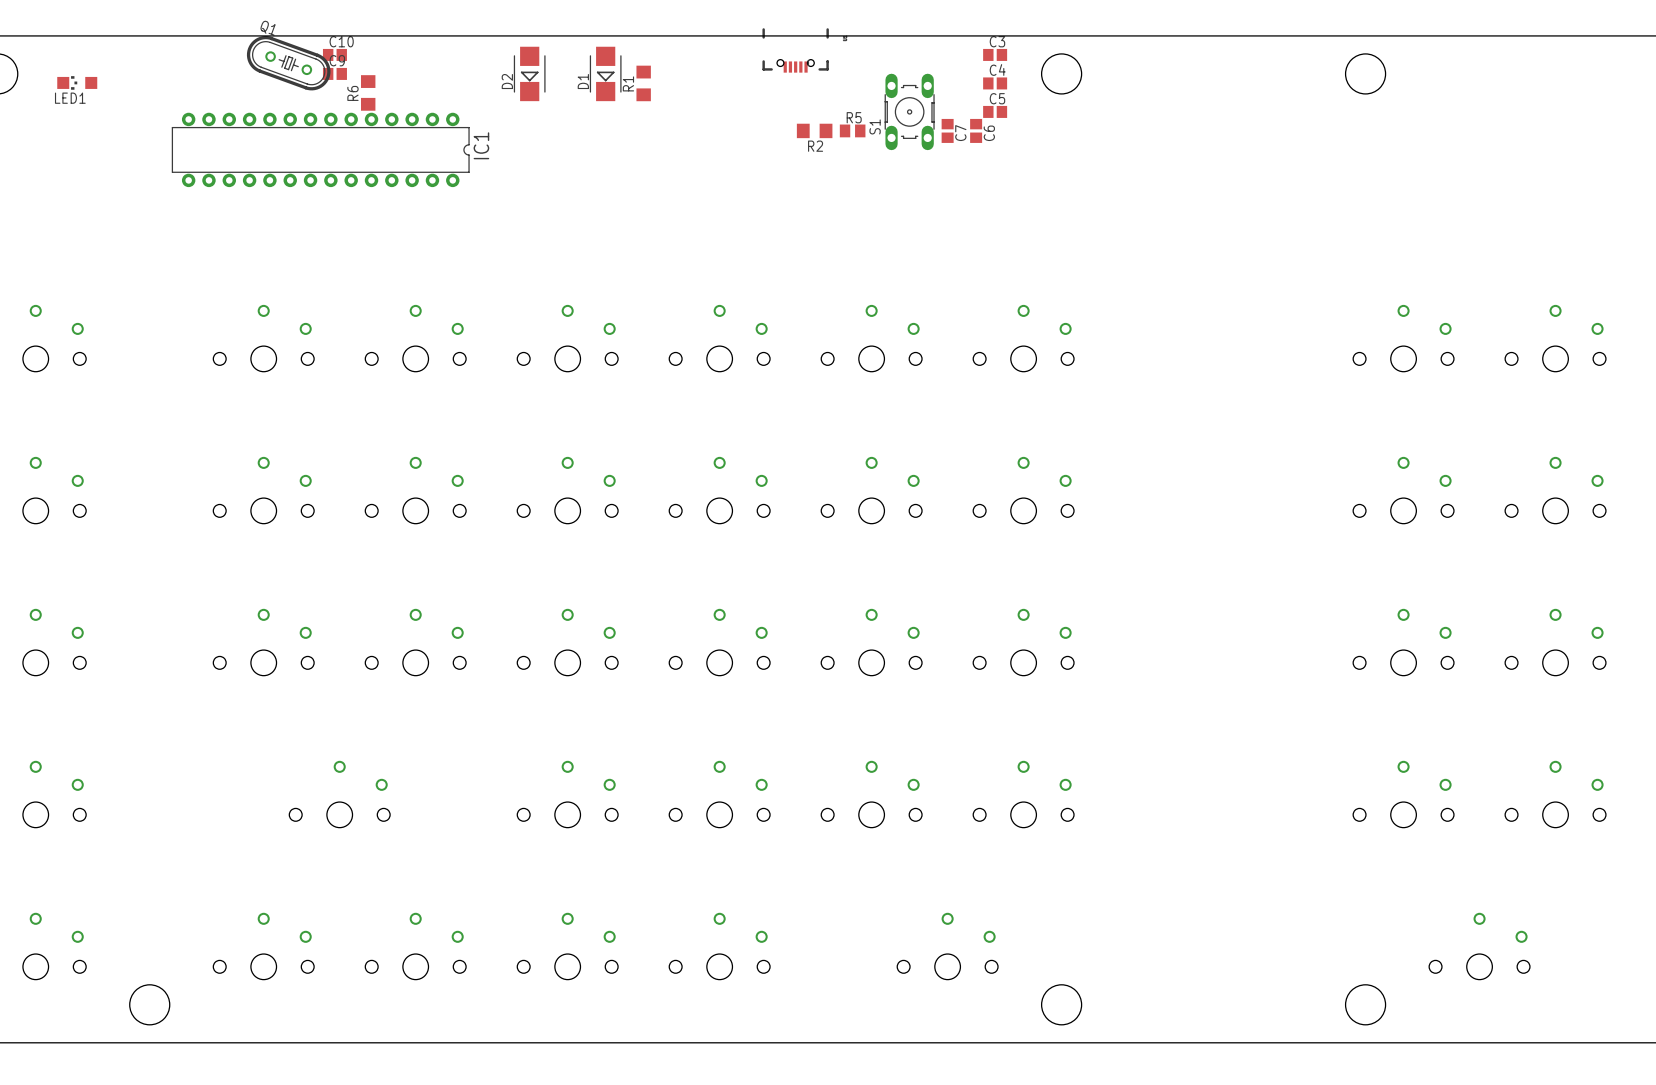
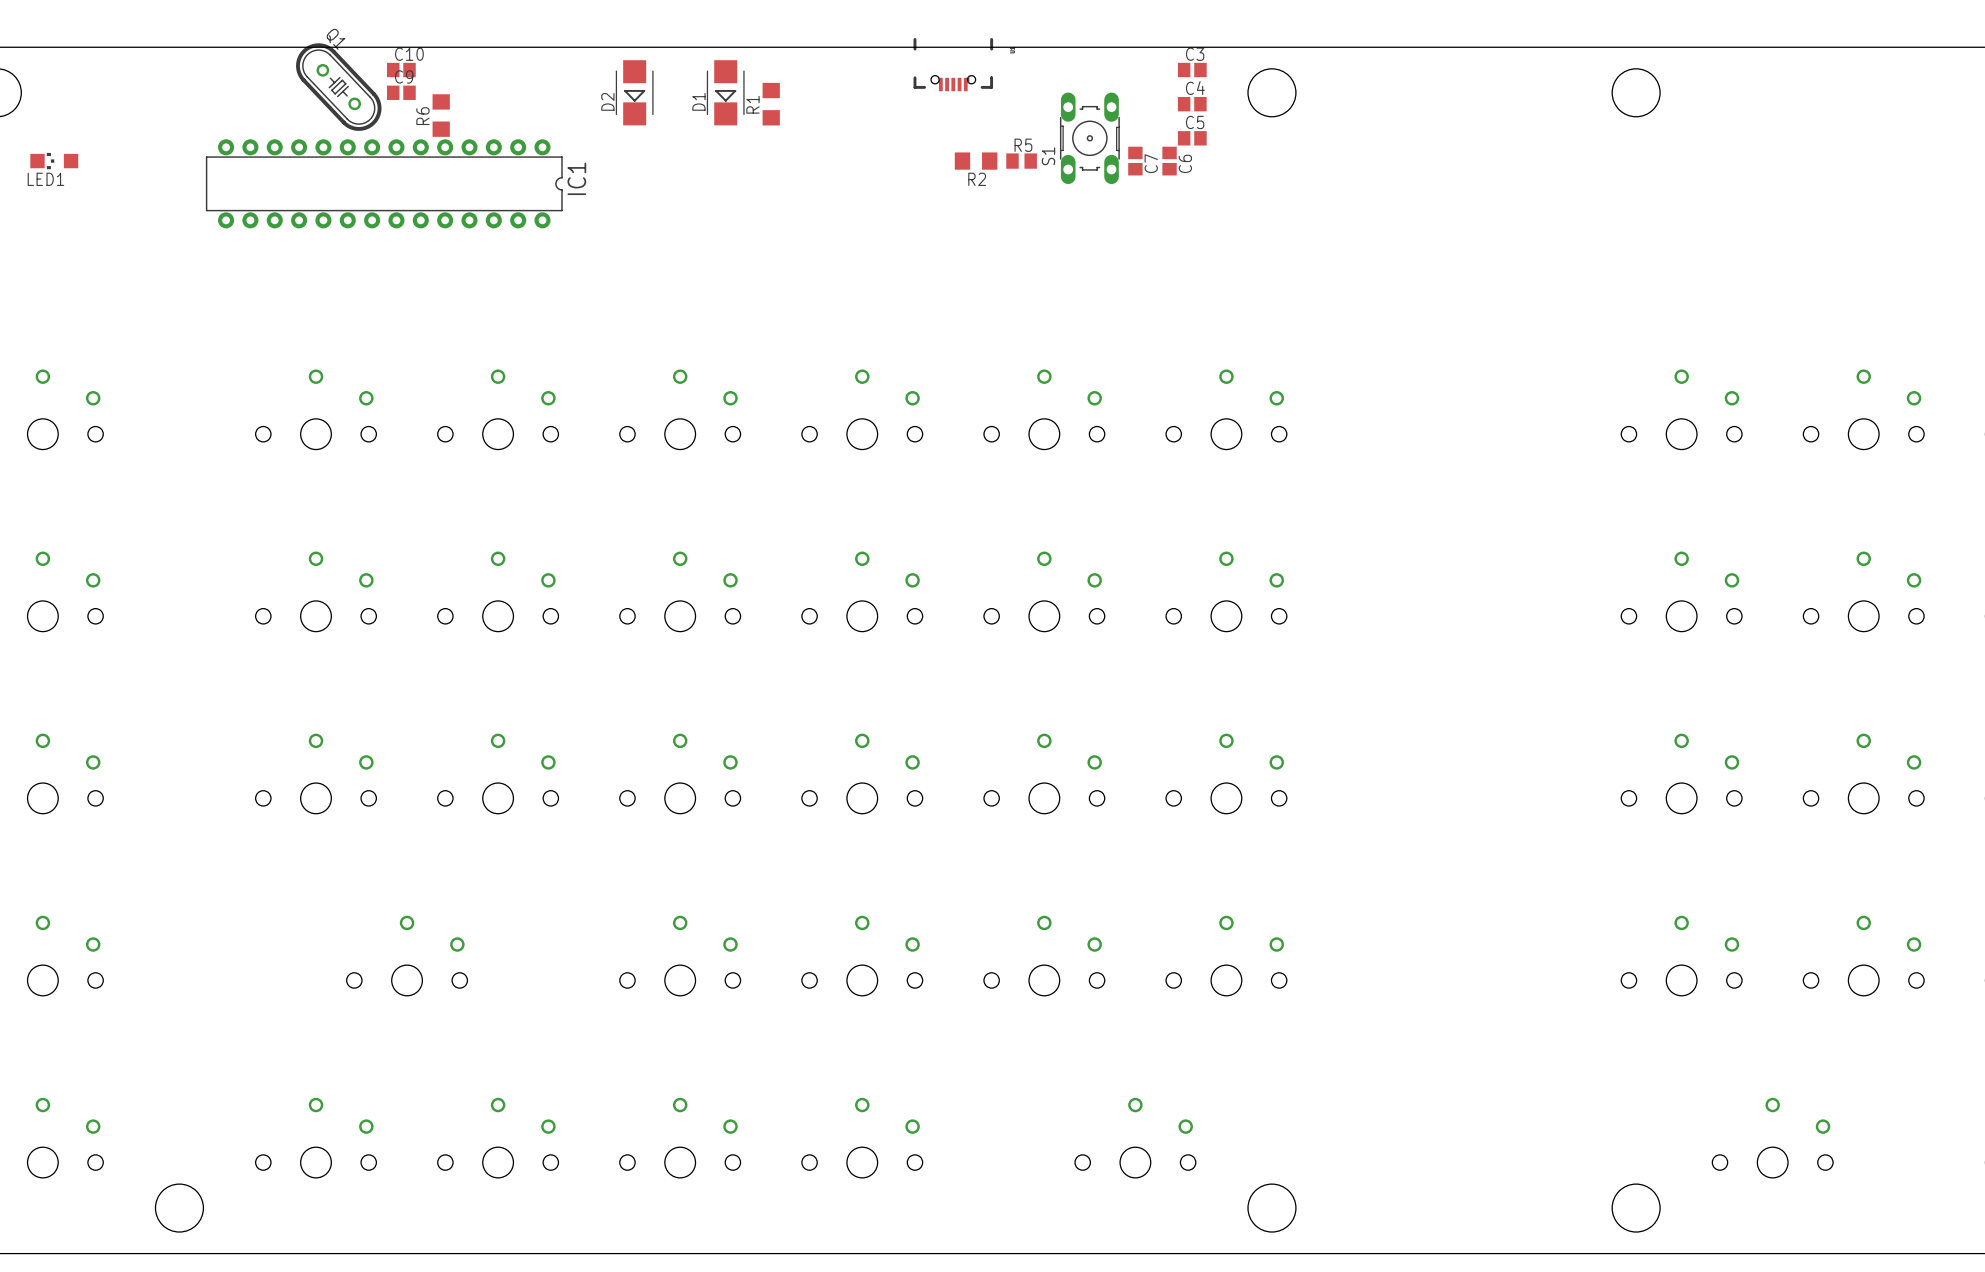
Q1 rotation: 0° (288, 63) -> 26.5° clockwise (338, 87)
LED1 position: (77, 82) -> (54, 161)

